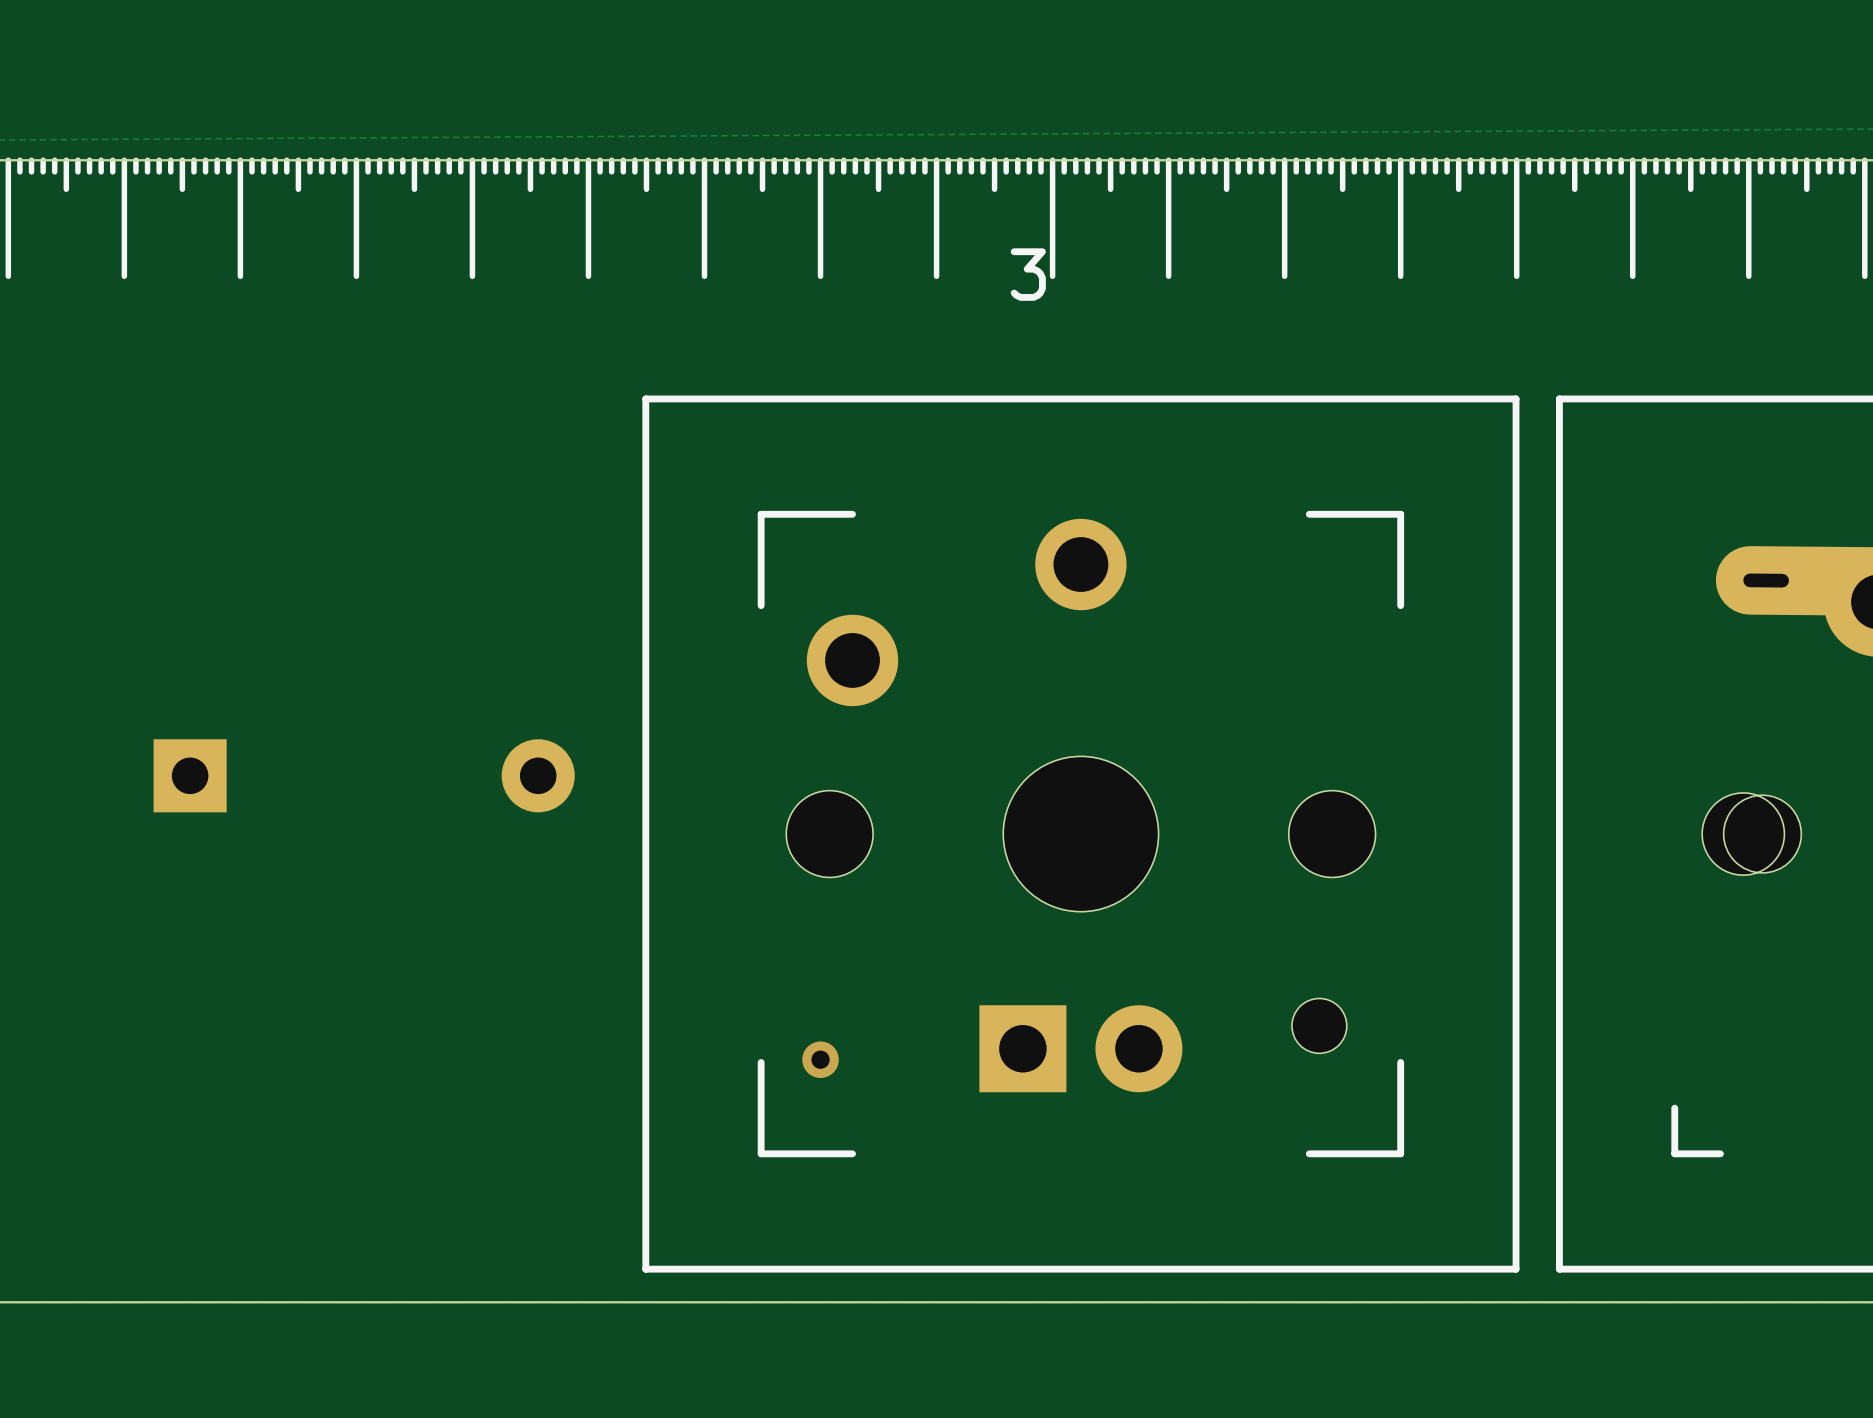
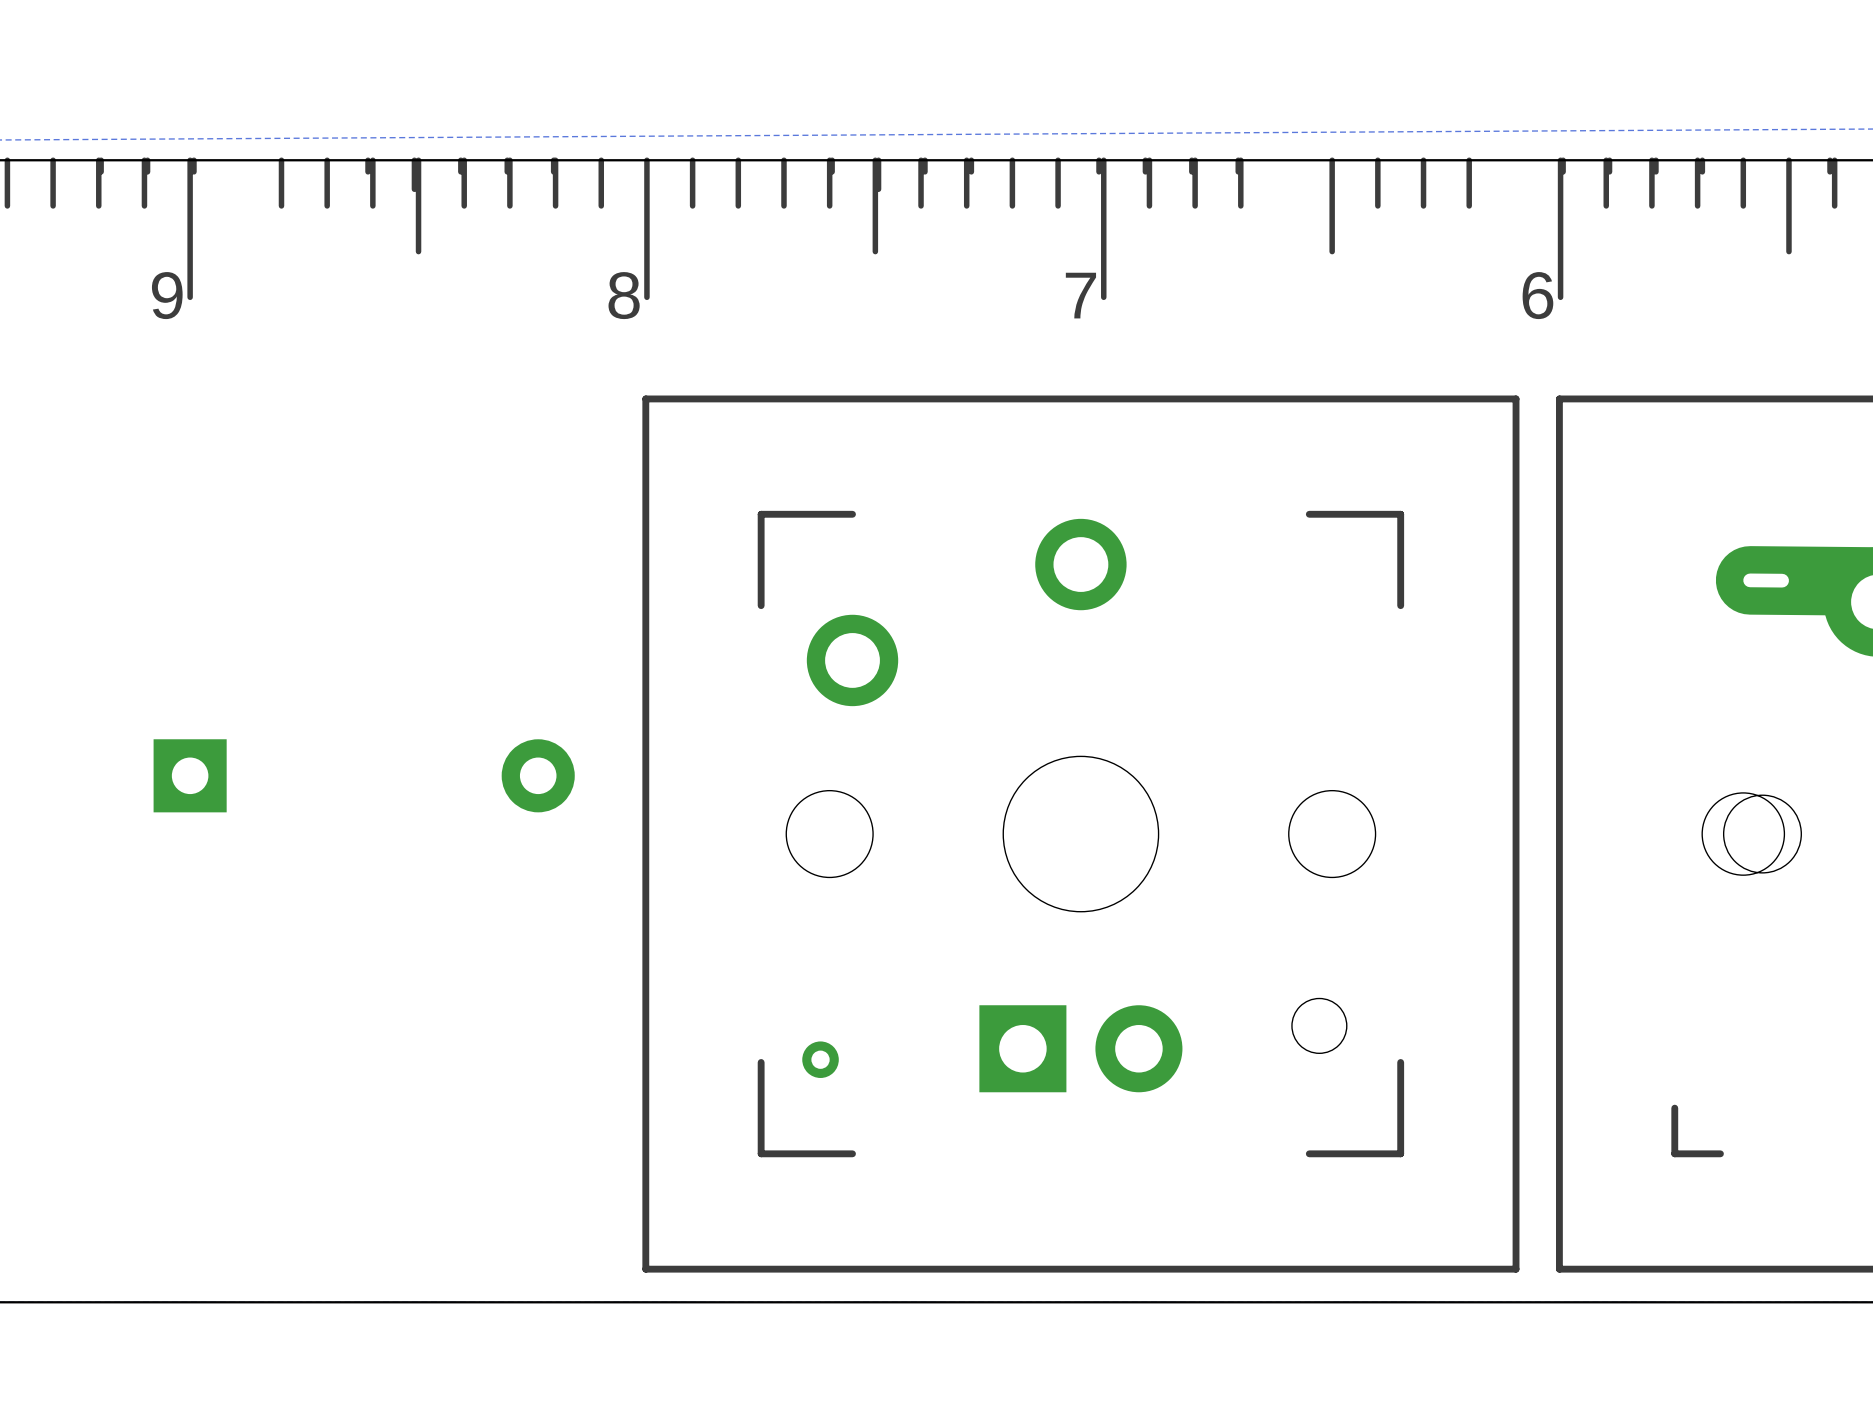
line: (8, 160) (8, 276) -> (7, 160) (7, 205)
line: (19, 160) (19, 171) -> none
line: (31, 160) (31, 171) -> none
line: (43, 160) (43, 171) -> none
line: (54, 160) (54, 171) -> (53, 160) (53, 205)
line: (66, 160) (66, 189) -> none
line: (77, 160) (77, 171) -> none
line: (89, 160) (89, 171) -> none
line: none -> (98, 160) (98, 205)
line: (112, 160) (112, 171) -> none
line: (124, 160) (124, 276) -> none
line: (135, 160) (135, 171) -> none
line: none -> (144, 160) (144, 205)
line: (159, 160) (159, 171) -> none
line: (170, 160) (170, 171) -> none
line: (182, 160) (182, 189) -> none
line: none -> (190, 160) (190, 297)
line: (205, 160) (205, 171) -> none
line: (217, 160) (217, 171) -> none
line: (228, 160) (228, 171) -> none
line: (240, 160) (240, 276) -> none
line: (251, 160) (251, 171) -> none
line: (263, 160) (263, 171) -> none
line: (275, 160) (275, 171) -> none
line: none -> (281, 160) (281, 205)
line: (286, 160) (286, 171) -> none
line: (298, 160) (298, 189) -> none
line: (309, 160) (309, 171) -> none
line: (321, 160) (321, 171) -> none
line: none -> (327, 160) (327, 205)
line: (333, 160) (333, 171) -> none
line: (344, 160) (344, 171) -> none
line: (356, 160) (356, 276) -> none
line: none -> (372, 160) (372, 205)
line: (379, 160) (379, 171) -> none
line: (391, 160) (391, 171) -> none
line: (402, 160) (402, 171) -> none
line: none -> (418, 160) (418, 251)
line: (426, 160) (426, 171) -> none
line: (437, 160) (437, 171) -> none
line: (449, 160) (449, 171) -> none
line: none -> (464, 160) (464, 205)
line: (472, 160) (472, 276) -> none
line: (484, 160) (484, 171) -> none
line: (495, 160) (495, 171) -> none
line: none -> (509, 160) (509, 205)
line: (518, 160) (518, 171) -> none
line: (530, 160) (530, 189) -> none
line: (542, 160) (542, 171) -> none
line: none -> (555, 160) (555, 205)
line: (565, 160) (565, 171) -> none
line: (576, 160) (576, 171) -> none
line: (588, 160) (588, 276) -> none
line: (600, 160) (600, 171) -> (601, 160) (601, 205)
line: (611, 160) (611, 171) -> none
line: (623, 160) (623, 171) -> none
line: (634, 160) (634, 171) -> none
line: (646, 160) (646, 189) -> (646, 160) (646, 297)
line: (658, 160) (658, 171) -> none
line: (669, 160) (669, 171) -> none
line: (681, 160) (681, 171) -> none
line: (692, 160) (692, 171) -> (692, 160) (692, 205)
line: (704, 160) (704, 276) -> none
line: (716, 160) (716, 171) -> none
line: (727, 160) (727, 171) -> none
line: (739, 160) (739, 171) -> (738, 160) (738, 205)
line: (750, 160) (750, 171) -> none
line: (762, 160) (762, 189) -> none
line: (774, 160) (774, 171) -> none
line: (785, 160) (785, 171) -> (783, 160) (783, 205)
line: (797, 160) (797, 171) -> none
line: (808, 160) (808, 171) -> none
line: (820, 160) (820, 276) -> none
line: none -> (829, 160) (829, 205)
line: (843, 160) (843, 171) -> none
line: (855, 160) (855, 171) -> none
line: (866, 160) (866, 171) -> none
line: none -> (875, 160) (875, 251)
line: (890, 160) (890, 171) -> none
line: (901, 160) (901, 171) -> none
line: (913, 160) (913, 171) -> none
line: none -> (921, 160) (921, 205)
line: (936, 160) (936, 276) -> none
line: (948, 160) (948, 171) -> none
line: (959, 160) (959, 171) -> none
line: none -> (966, 160) (966, 205)
line: (982, 160) (982, 171) -> none
line: (994, 160) (994, 189) -> none
line: (1006, 160) (1006, 171) -> none
line: none -> (1012, 160) (1012, 205)
line: (1017, 160) (1017, 171) -> none
line: (1029, 160) (1029, 171) -> none
line: (1040, 160) (1040, 171) -> none
line: (1052, 160) (1052, 276) -> none
line: none -> (1058, 160) (1058, 205)
line: (1064, 160) (1064, 171) -> none
line: (1075, 160) (1075, 171) -> none
line: (1087, 160) (1087, 171) -> none
line: none -> (1103, 160) (1103, 297)
line: (1110, 160) (1110, 189) -> none
line: (1122, 160) (1122, 171) -> none
line: (1133, 160) (1133, 171) -> none
line: none -> (1149, 160) (1149, 205)
line: (1157, 160) (1157, 171) -> none
line: (1168, 160) (1168, 276) -> none
line: (1180, 160) (1180, 171) -> none
line: none -> (1195, 160) (1195, 205)
line: (1203, 160) (1203, 171) -> none
line: (1215, 160) (1215, 171) -> none
line: (1226, 160) (1226, 189) -> none
line: none -> (1240, 160) (1240, 205)
line: (1249, 160) (1249, 171) -> none
line: (1261, 160) (1261, 171) -> none
line: (1273, 160) (1273, 171) -> none
line: (1284, 160) (1284, 276) -> none
line: (1296, 160) (1296, 171) -> none
line: (1307, 160) (1307, 171) -> none
line: (1319, 160) (1319, 171) -> none
line: (1331, 160) (1331, 171) -> (1332, 160) (1332, 251)
line: (1342, 160) (1342, 189) -> none
line: (1354, 160) (1354, 171) -> none
line: (1365, 160) (1365, 171) -> none
line: (1377, 160) (1377, 171) -> (1377, 160) (1377, 205)
line: (1389, 160) (1389, 171) -> none
line: (1400, 160) (1400, 276) -> none
line: (1412, 160) (1412, 171) -> none
line: (1423, 160) (1423, 171) -> (1423, 160) (1423, 205)
line: (1435, 160) (1435, 171) -> none
line: (1447, 160) (1447, 171) -> none
line: (1458, 160) (1458, 189) -> none
line: (1470, 160) (1470, 171) -> (1469, 160) (1469, 205)
line: (1481, 160) (1481, 171) -> none
line: (1493, 160) (1493, 171) -> none
line: (1505, 160) (1505, 171) -> none
line: (1516, 160) (1516, 276) -> none
line: (1528, 160) (1528, 171) -> none
line: (1539, 160) (1539, 171) -> none
line: (1551, 160) (1551, 171) -> none
line: none -> (1560, 160) (1560, 297)
line: (1574, 160) (1574, 189) -> none
line: (1586, 160) (1586, 171) -> none
line: (1597, 160) (1597, 171) -> none
line: none -> (1606, 160) (1606, 205)
line: (1621, 160) (1621, 171) -> none
line: (1632, 160) (1632, 276) -> none
line: (1644, 160) (1644, 171) -> none
line: none -> (1651, 160) (1651, 205)
line: (1667, 160) (1667, 171) -> none
line: (1679, 160) (1679, 171) -> none
line: (1690, 160) (1690, 189) -> none
line: none -> (1697, 160) (1697, 205)
line: (1713, 160) (1713, 171) -> none
line: (1725, 160) (1725, 171) -> none
line: (1737, 160) (1737, 171) -> none
line: none -> (1743, 160) (1743, 205)
line: (1748, 160) (1748, 276) -> none
line: (1760, 160) (1760, 171) -> none
line: (1771, 160) (1771, 171) -> none
line: (1783, 160) (1783, 171) -> none
line: none -> (1788, 160) (1788, 251)
line: (1795, 160) (1795, 171) -> none
line: (1806, 160) (1806, 189) -> none
line: (1818, 160) (1818, 171) -> none
line: none -> (1834, 160) (1834, 205)
line: (1841, 160) (1841, 171) -> none
line: (1853, 160) (1853, 171) -> none
line: (1864, 160) (1864, 276) -> none
text: 3 (1028, 274) -> none
text: none -> 9 (167, 295)
text: none -> 8 (624, 295)
text: none -> 7 (1080, 295)
text: none -> 6 (1537, 295)

